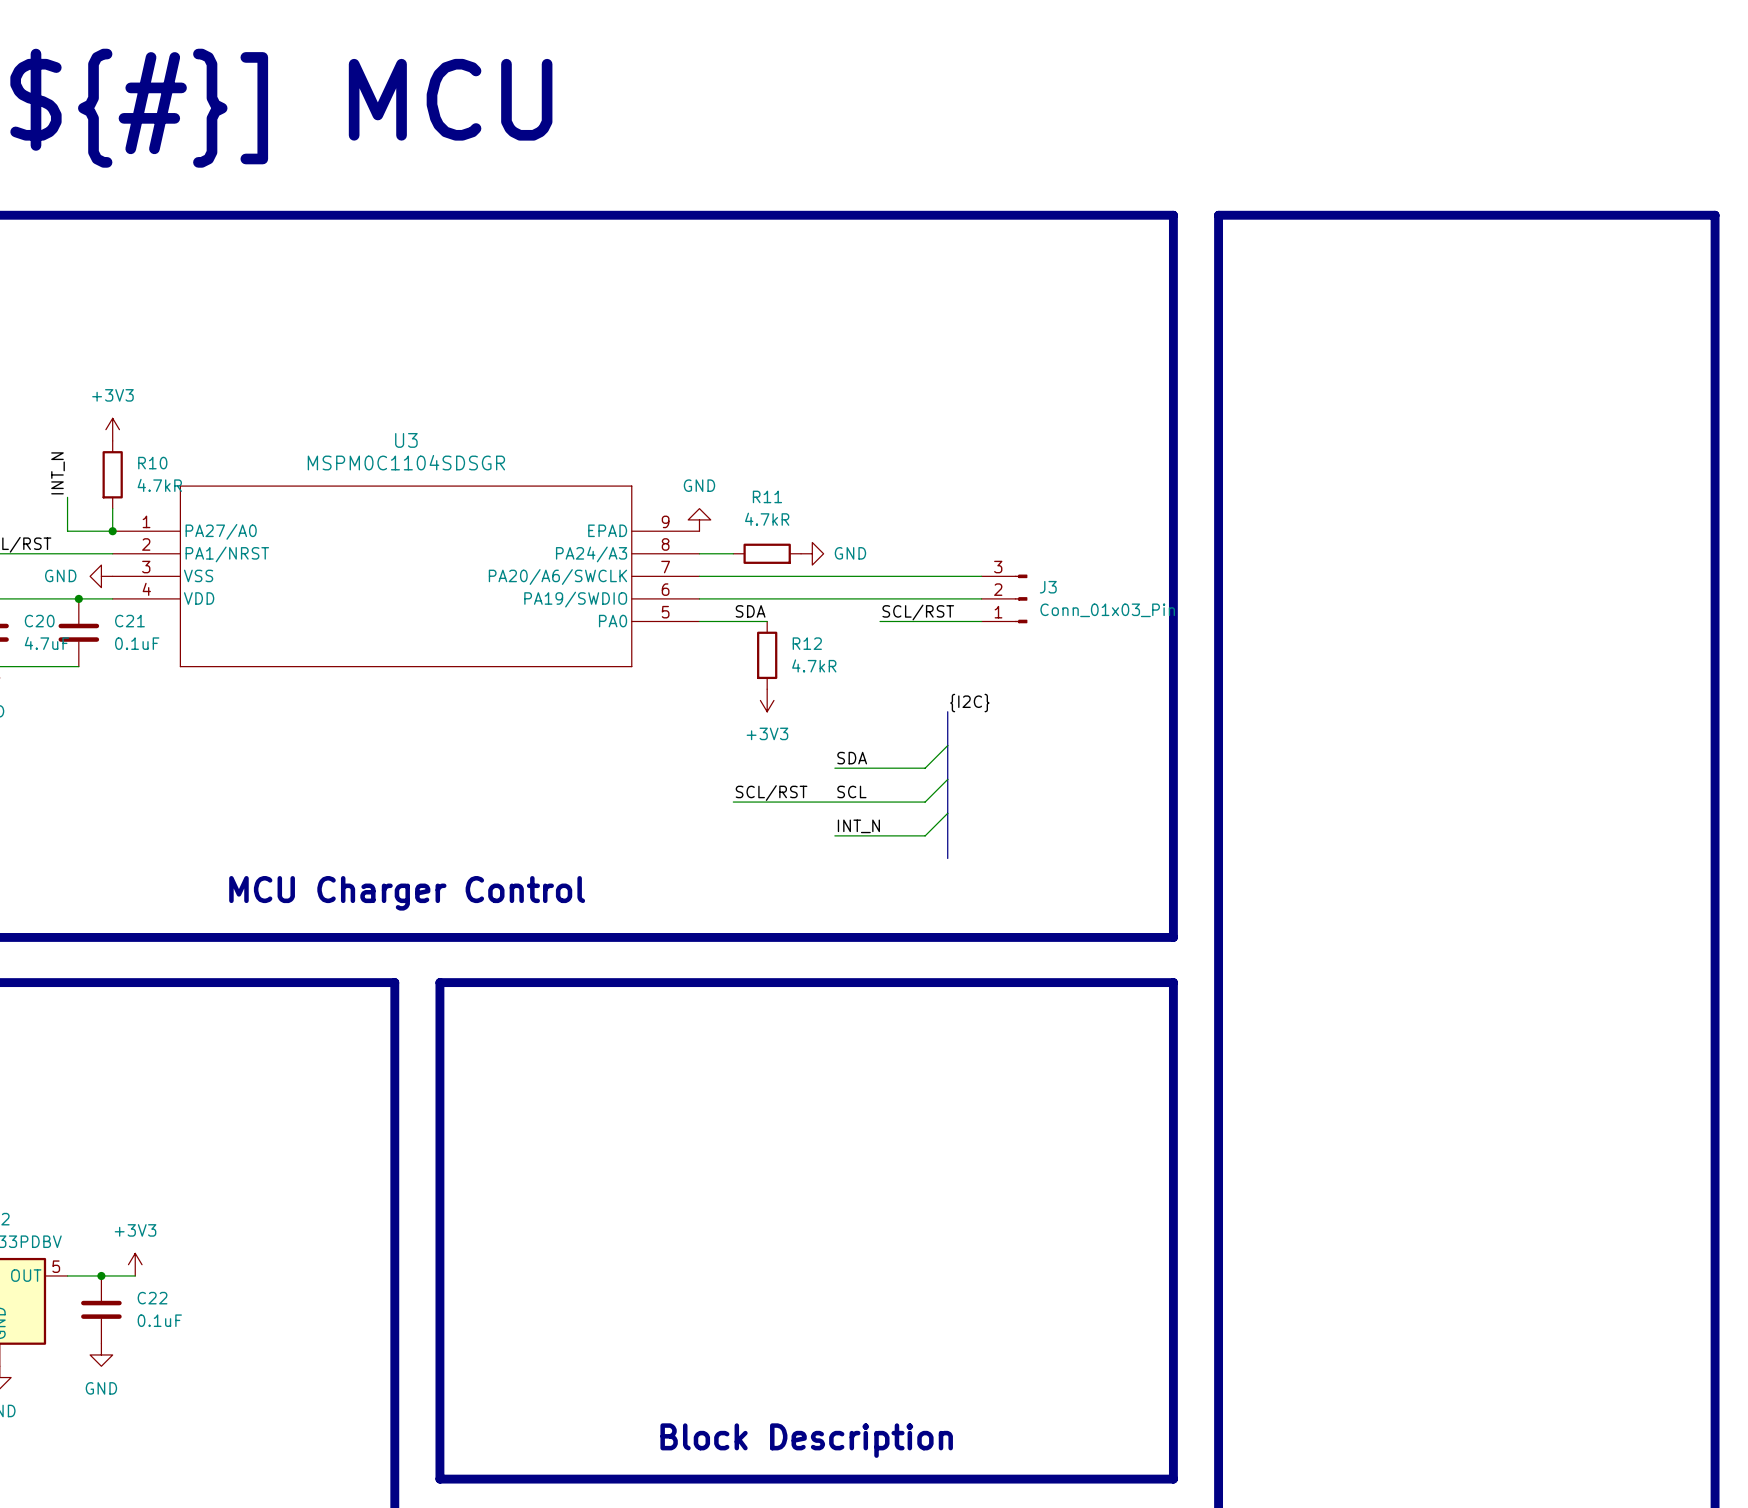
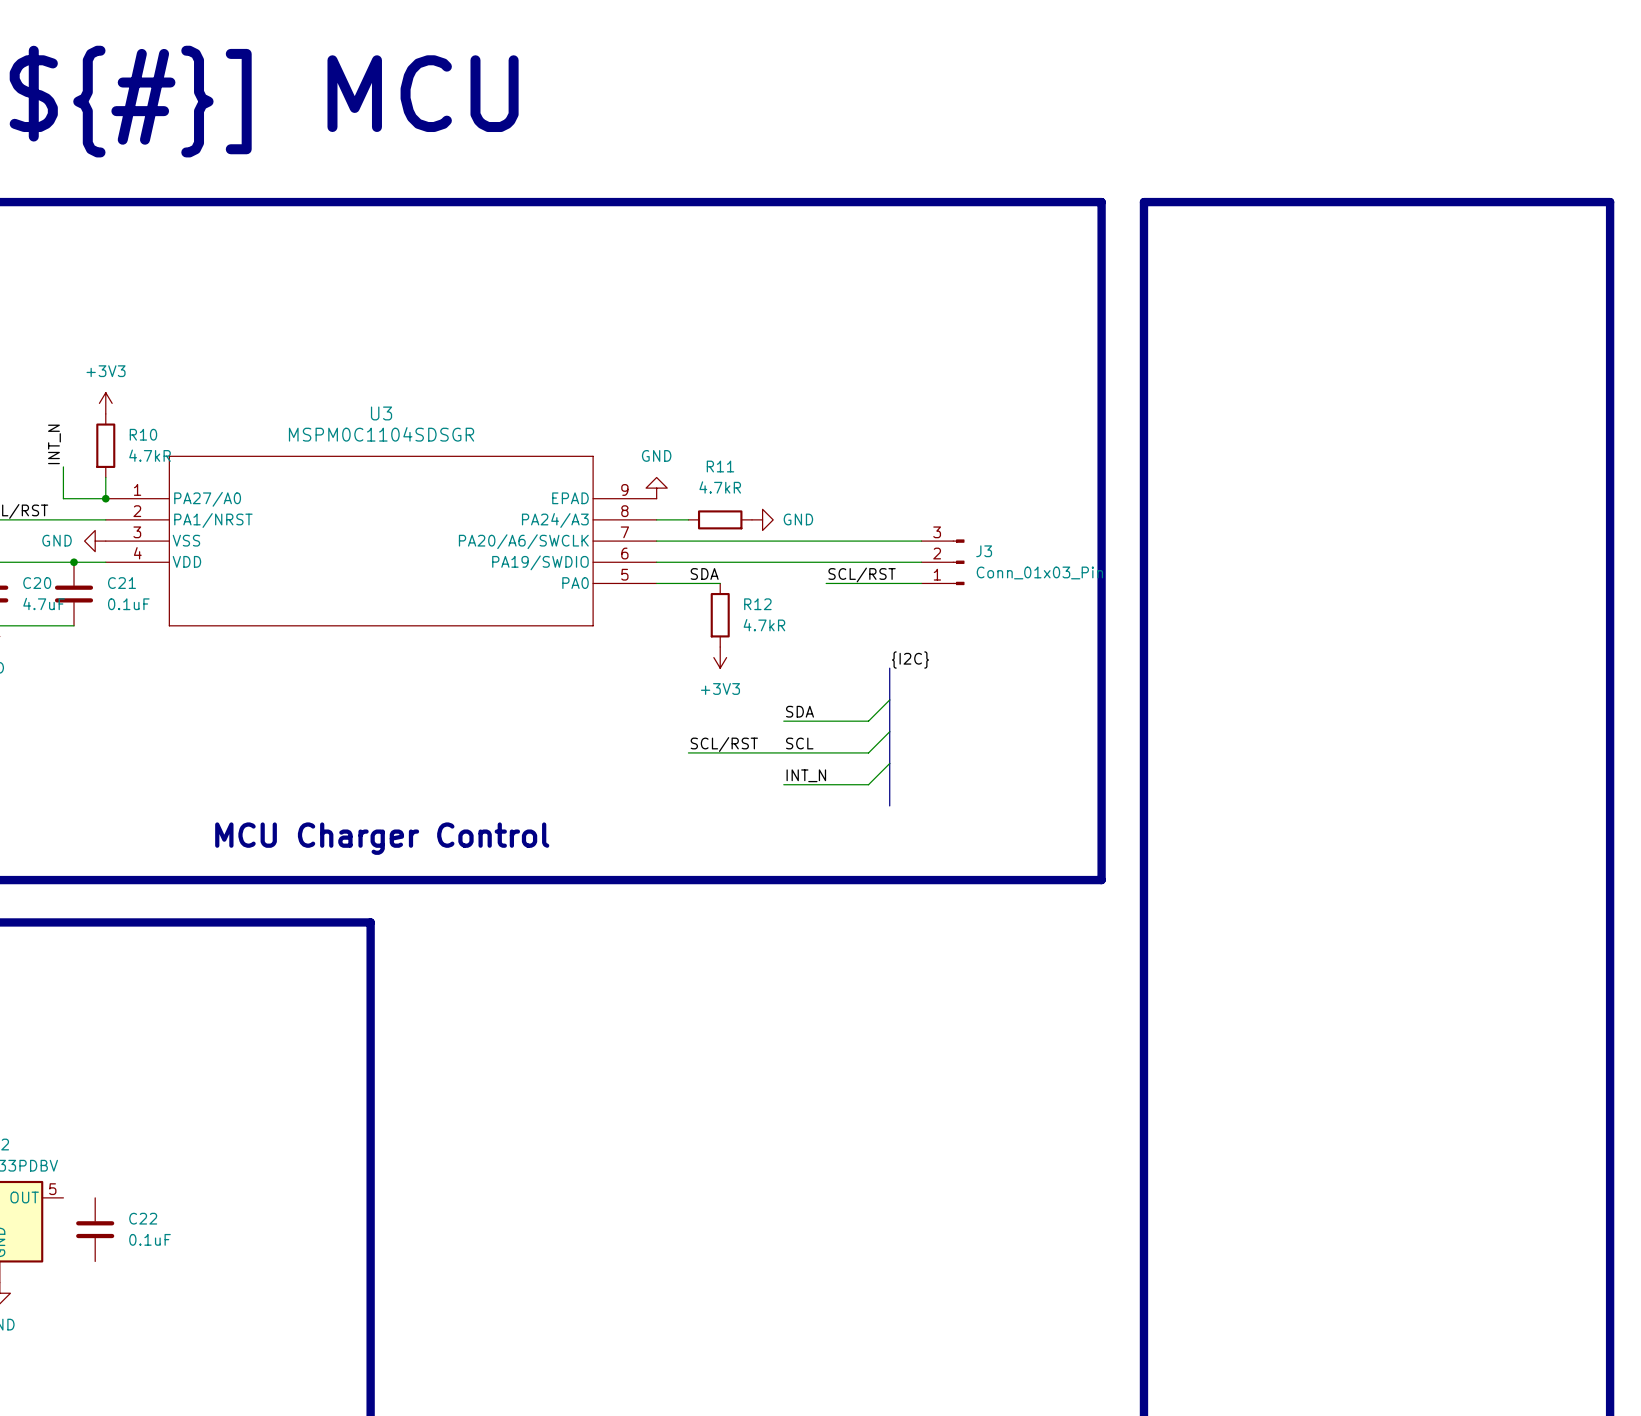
line: (439, 982) (1173, 982) (1173, 1479) (439, 1479) (439, 982) -> none
power symbol: +3V3 (135, 1264) -> none
wire: (67, 1275) (135, 1275) -> none
junction: (101, 1275) -> none
power symbol: GND (101, 1354) -> none
text: Block Description (806, 1440) -> none

